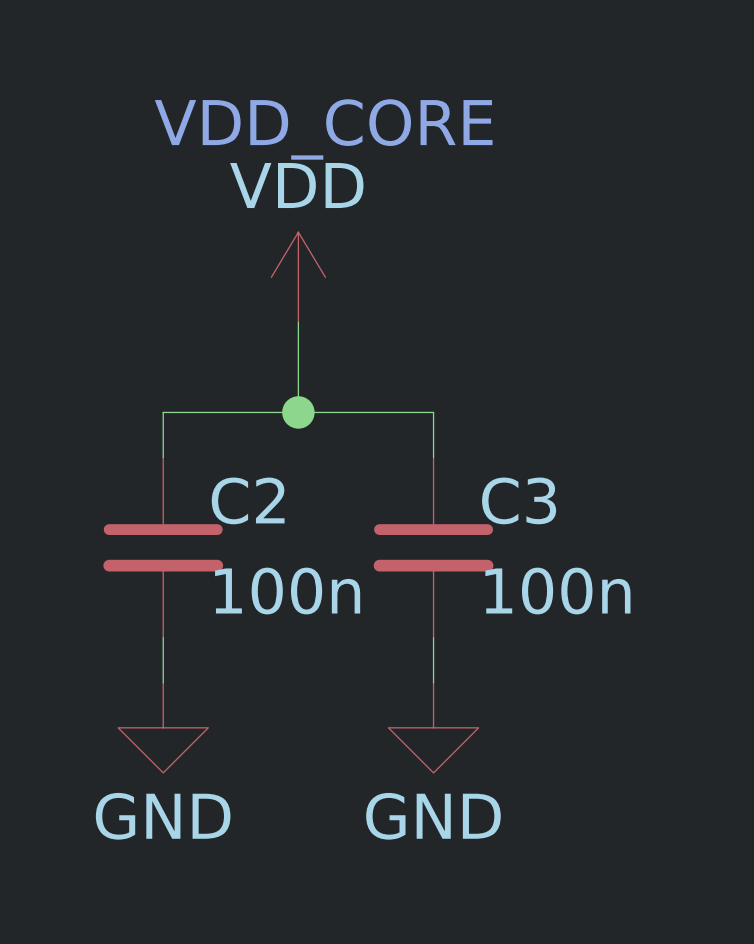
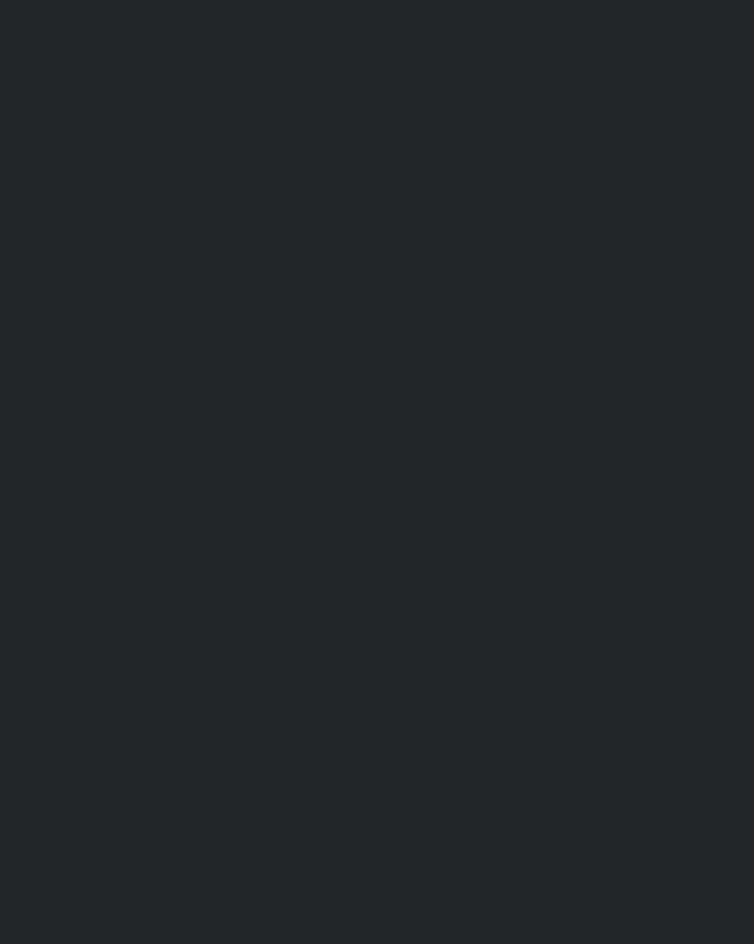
text: VDD_CORE (323, 129) -> none
power symbol: VDD (298, 277) -> none
wire: (298, 322) (298, 412) -> none
junction: (298, 412) -> none
wire: (163, 457) (163, 412) (433, 412) (433, 457) -> none
C2: 100n (163, 547) -> none
C3: 100n (433, 547) -> none
wire: (163, 637) (163, 682) -> none
wire: (433, 637) (433, 682) -> none
power symbol: GND (163, 727) -> none
power symbol: GND (433, 727) -> none

